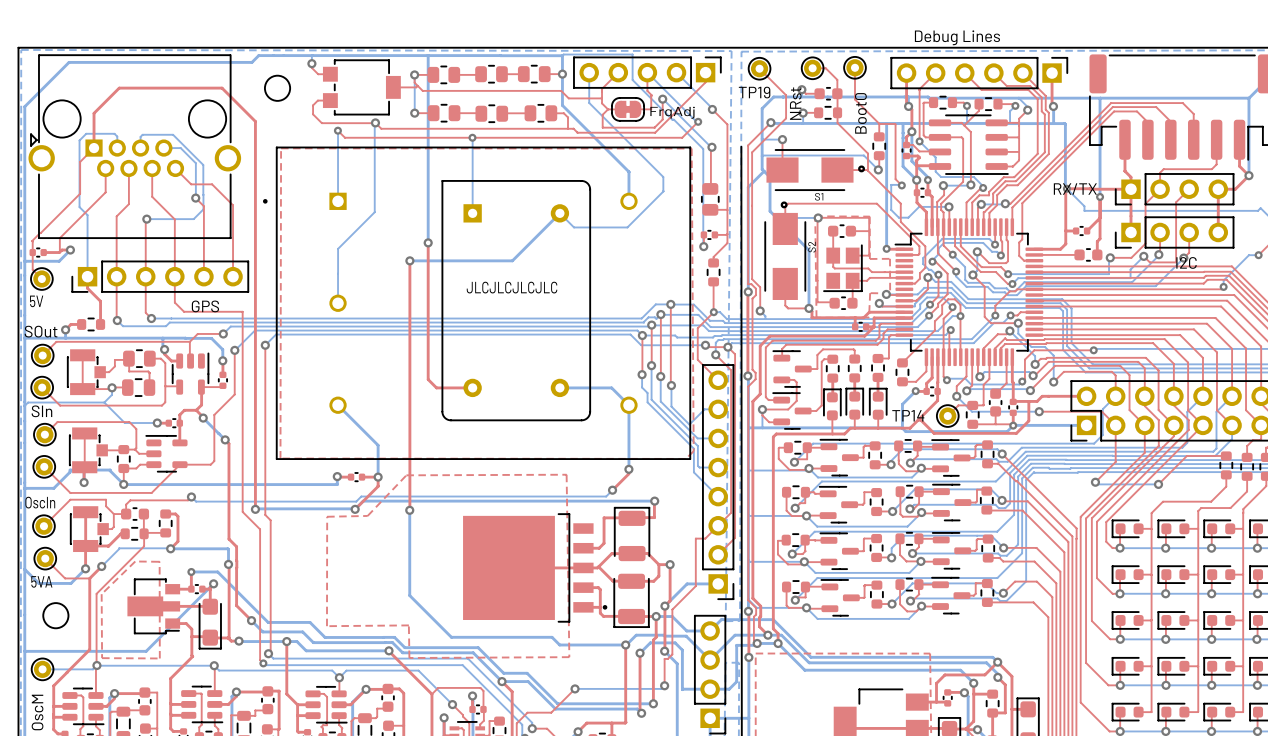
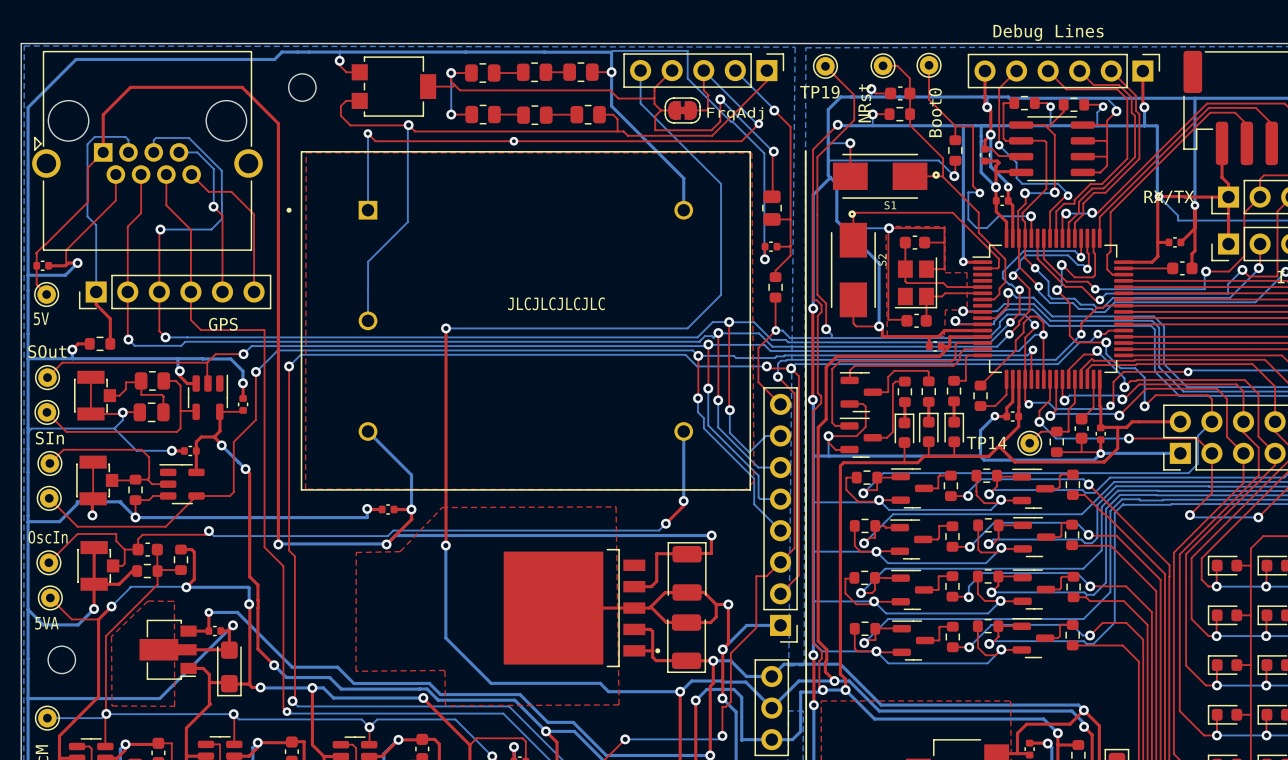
bottom track: (428, 55) (428, 242) -> none
bottom track: (472, 137) (472, 213) -> none
bottom track: (663, 191) (627, 227) (574, 227) (559, 213) (512, 260) (409, 260) -> (721, 199) (721, 294) (687, 328) (446, 328)
top track: (428, 242) (428, 379) (436, 387) (472, 387) -> none
via: (428, 242) -> none
top track: (409, 260) (409, 310) -> none
via: (409, 260) -> none
part: (516, 300) -> none
via: none -> (446, 328)
bottom track: (559, 387) (611, 387) (628, 405) -> none

